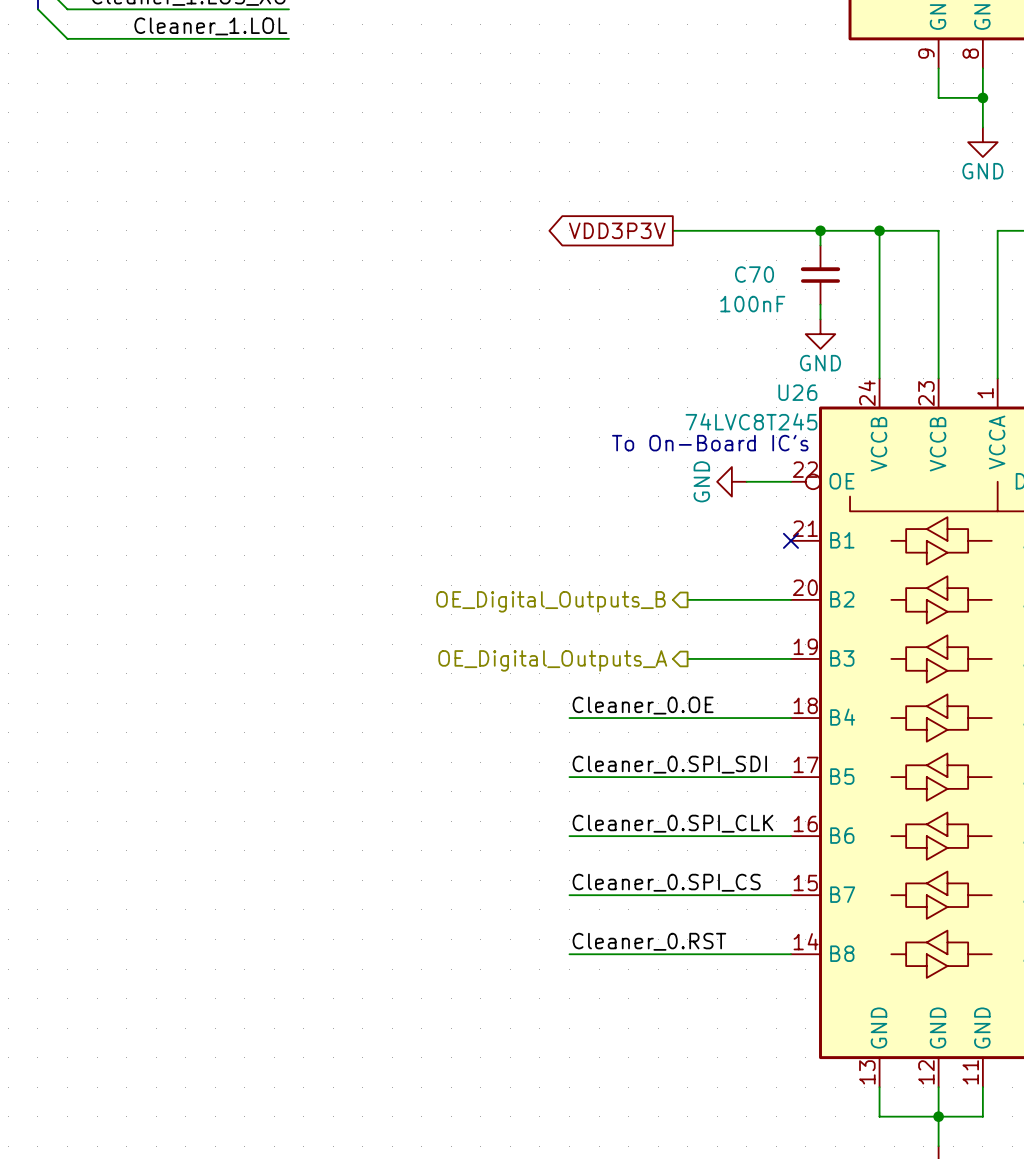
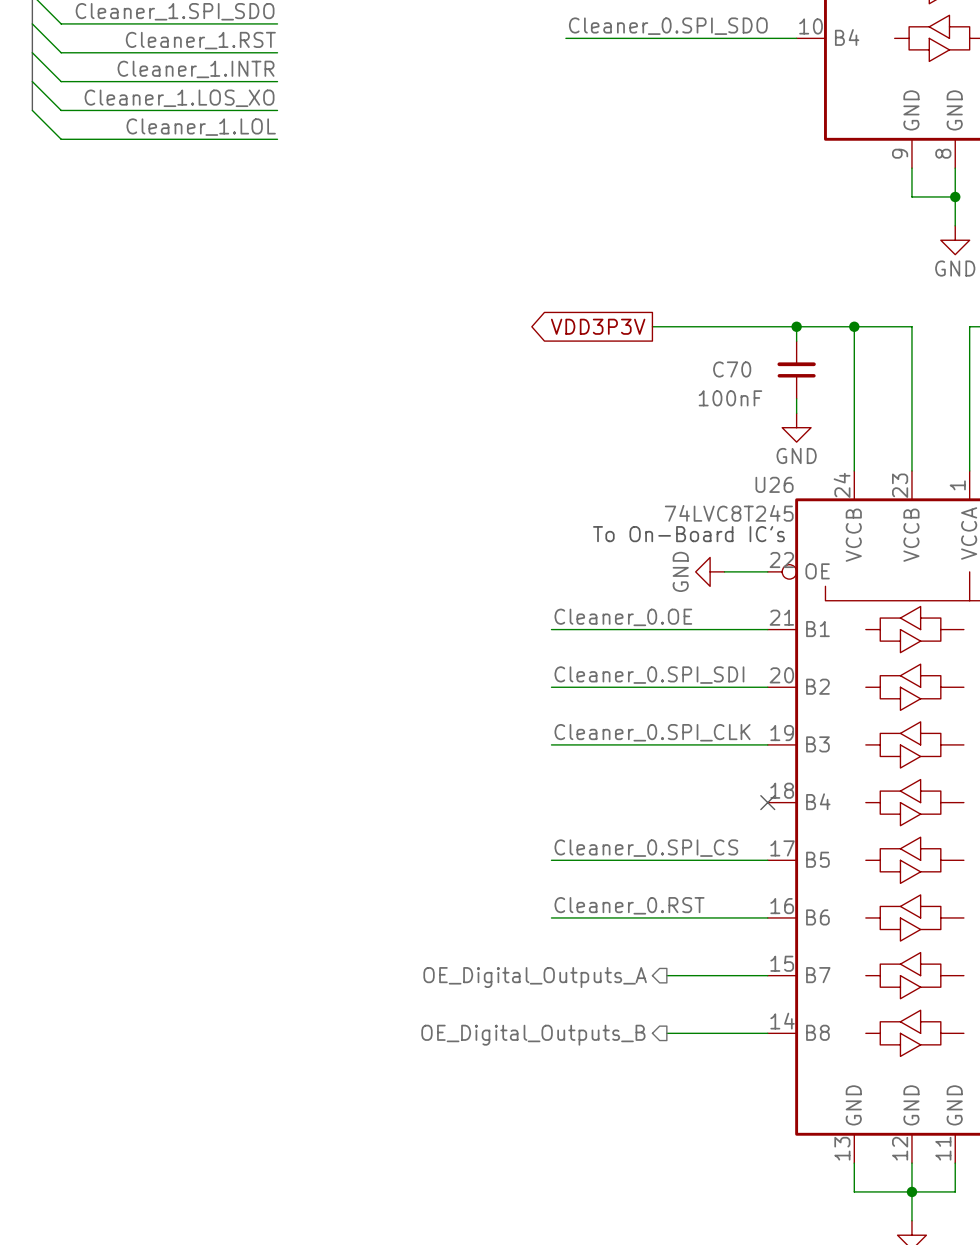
no-connect mark: (790, 540) -> none
label: none -> Cleaner_0.SPI_SDI (649, 675)
wire: none -> (551, 687) (666, 687)
hierarchical label: OE_Digital_Outputs_B (550, 601) -> none
label: none -> Cleaner_0.SPI_CLK (652, 732)
hierarchical label position: OE_Digital_Outputs_A (552, 660) -> OE_Digital_Outputs_A (535, 977)
label position: Cleaner_0.OE (643, 705) -> Cleaner_0.OE (623, 617)
wire: (569, 718) (790, 718) -> (551, 629) (767, 629)
no-connect mark: none -> (767, 802)
label: Cleaner_0.SPI_SDI (669, 764) -> Cleaner_0.SPI_CS (646, 848)
label: Cleaner_0.SPI_CLK (672, 823) -> Cleaner_0.RST (629, 905)
label: Cleaner_0.SPI_CS (666, 882) -> none
wire: (569, 895) (687, 895) -> (551, 744) (666, 744)
label: Cleaner_0.RST (649, 941) -> none
wire: (569, 954) (687, 954) -> none
hierarchical label: none -> OE_Digital_Outputs_B (533, 1035)

